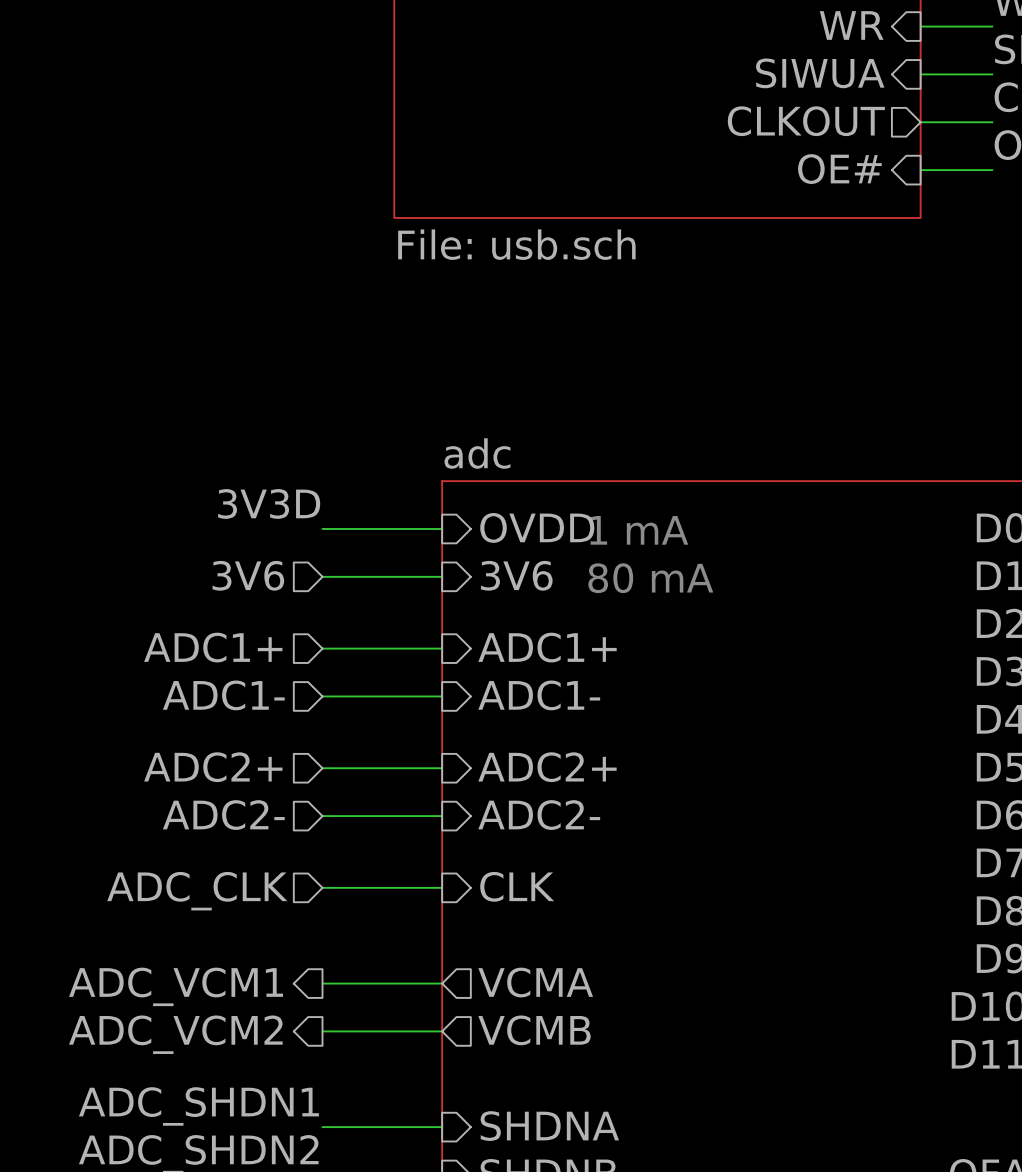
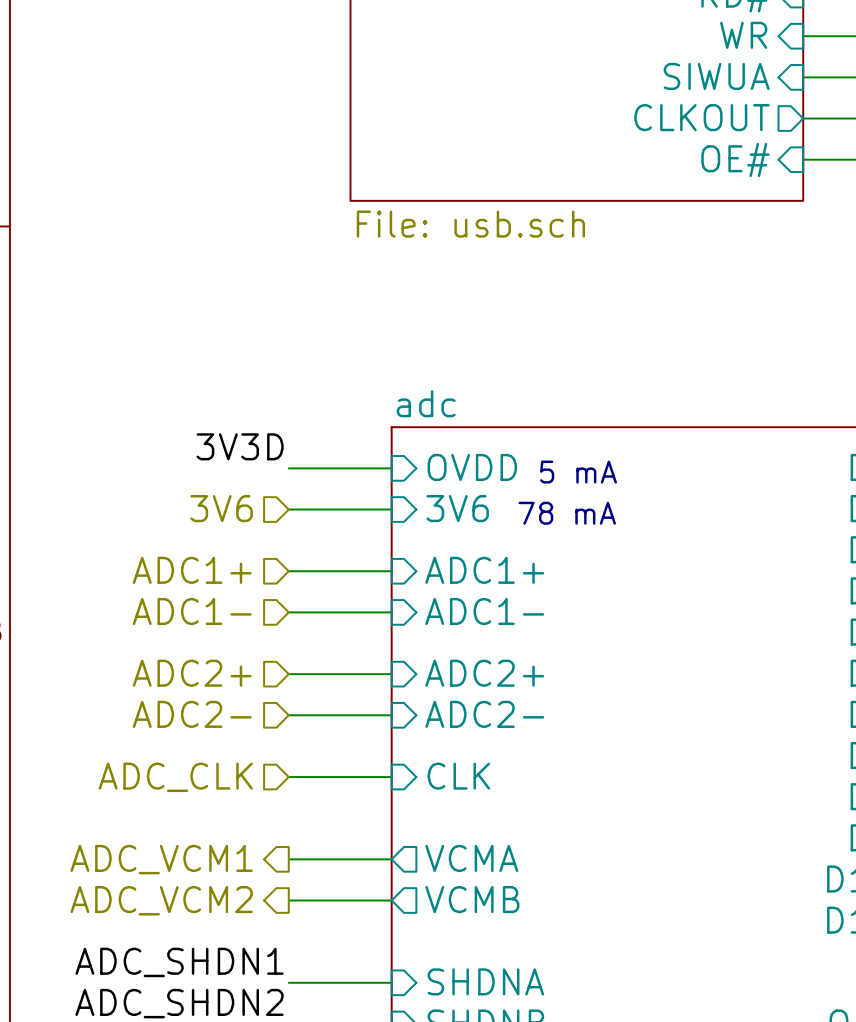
text: 1 mA (639, 530) -> 5 mA (578, 472)
text: 80 mA (650, 578) -> 78 mA (567, 513)

